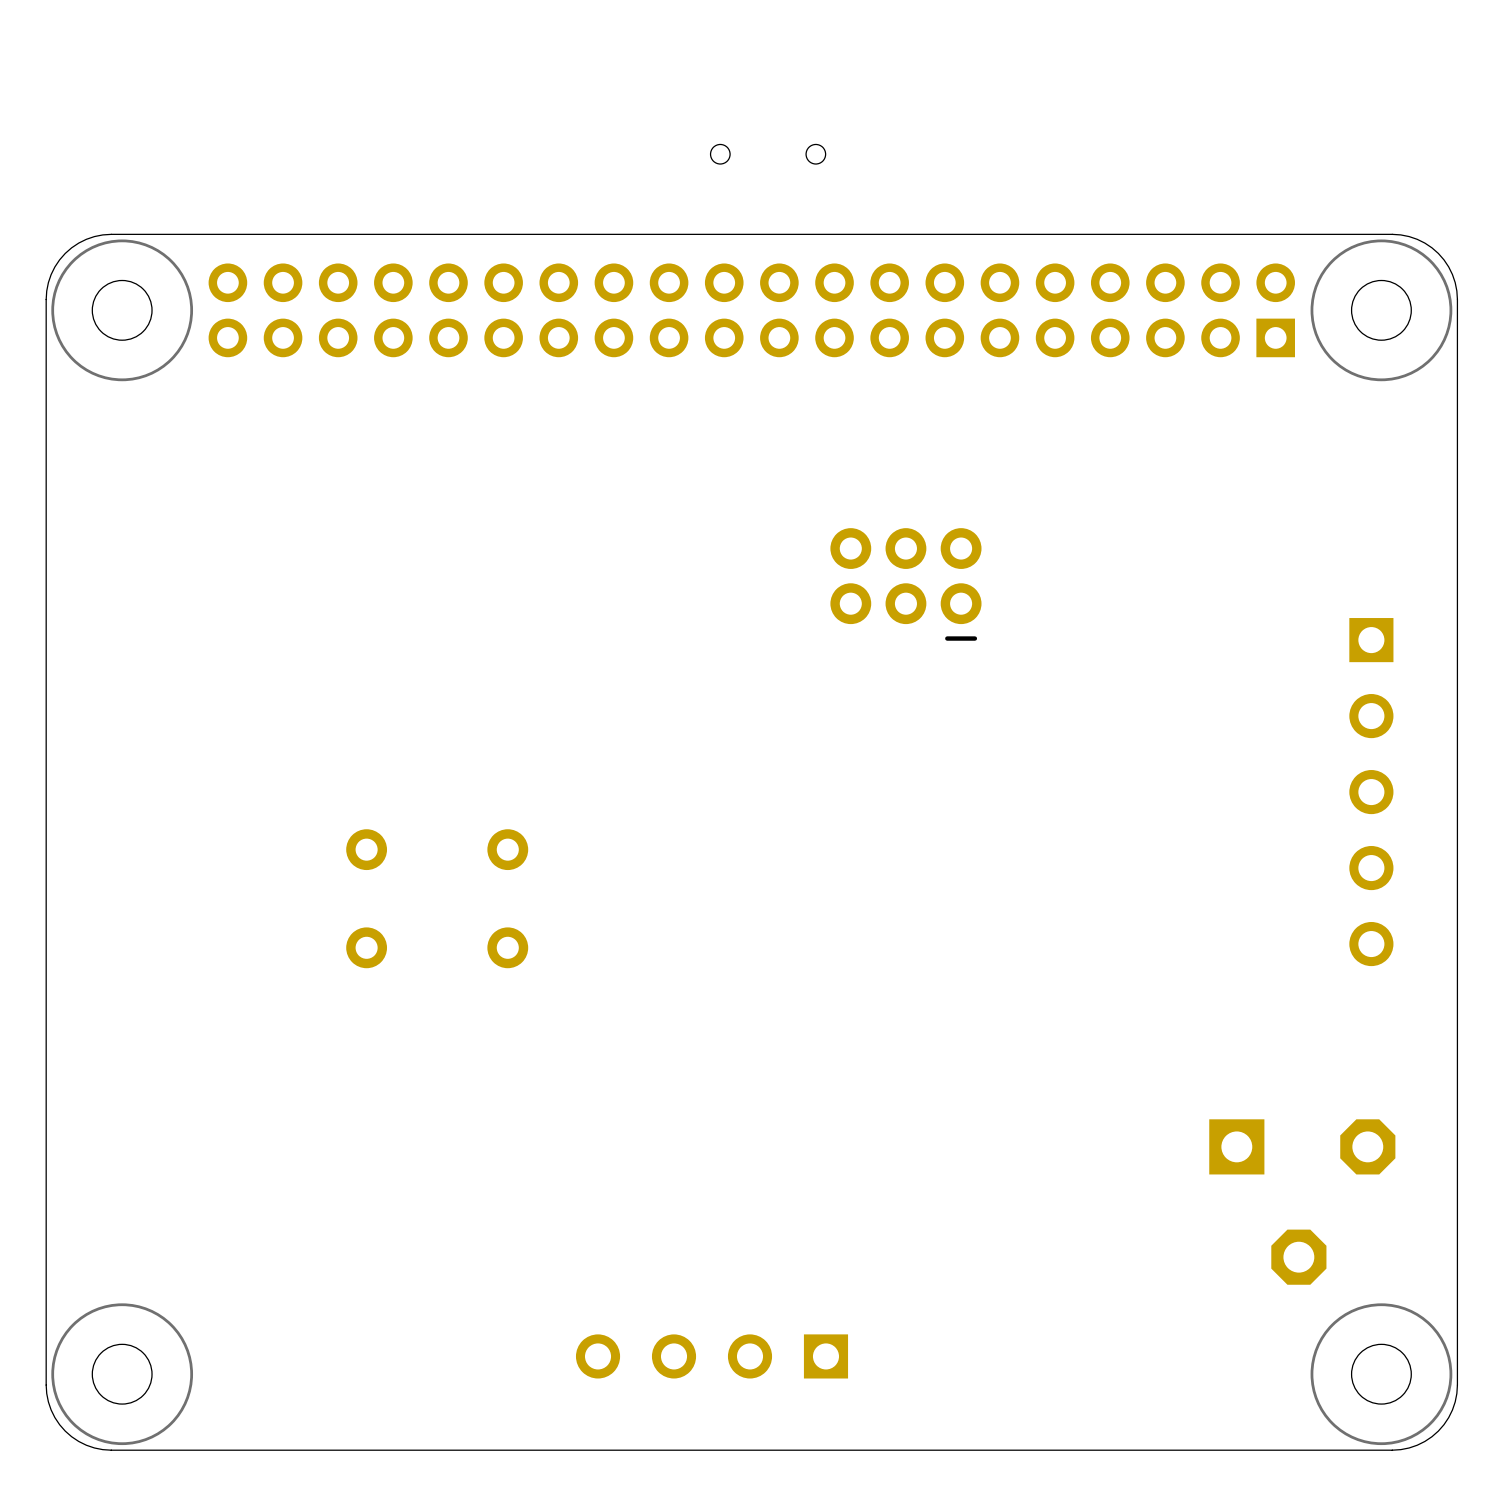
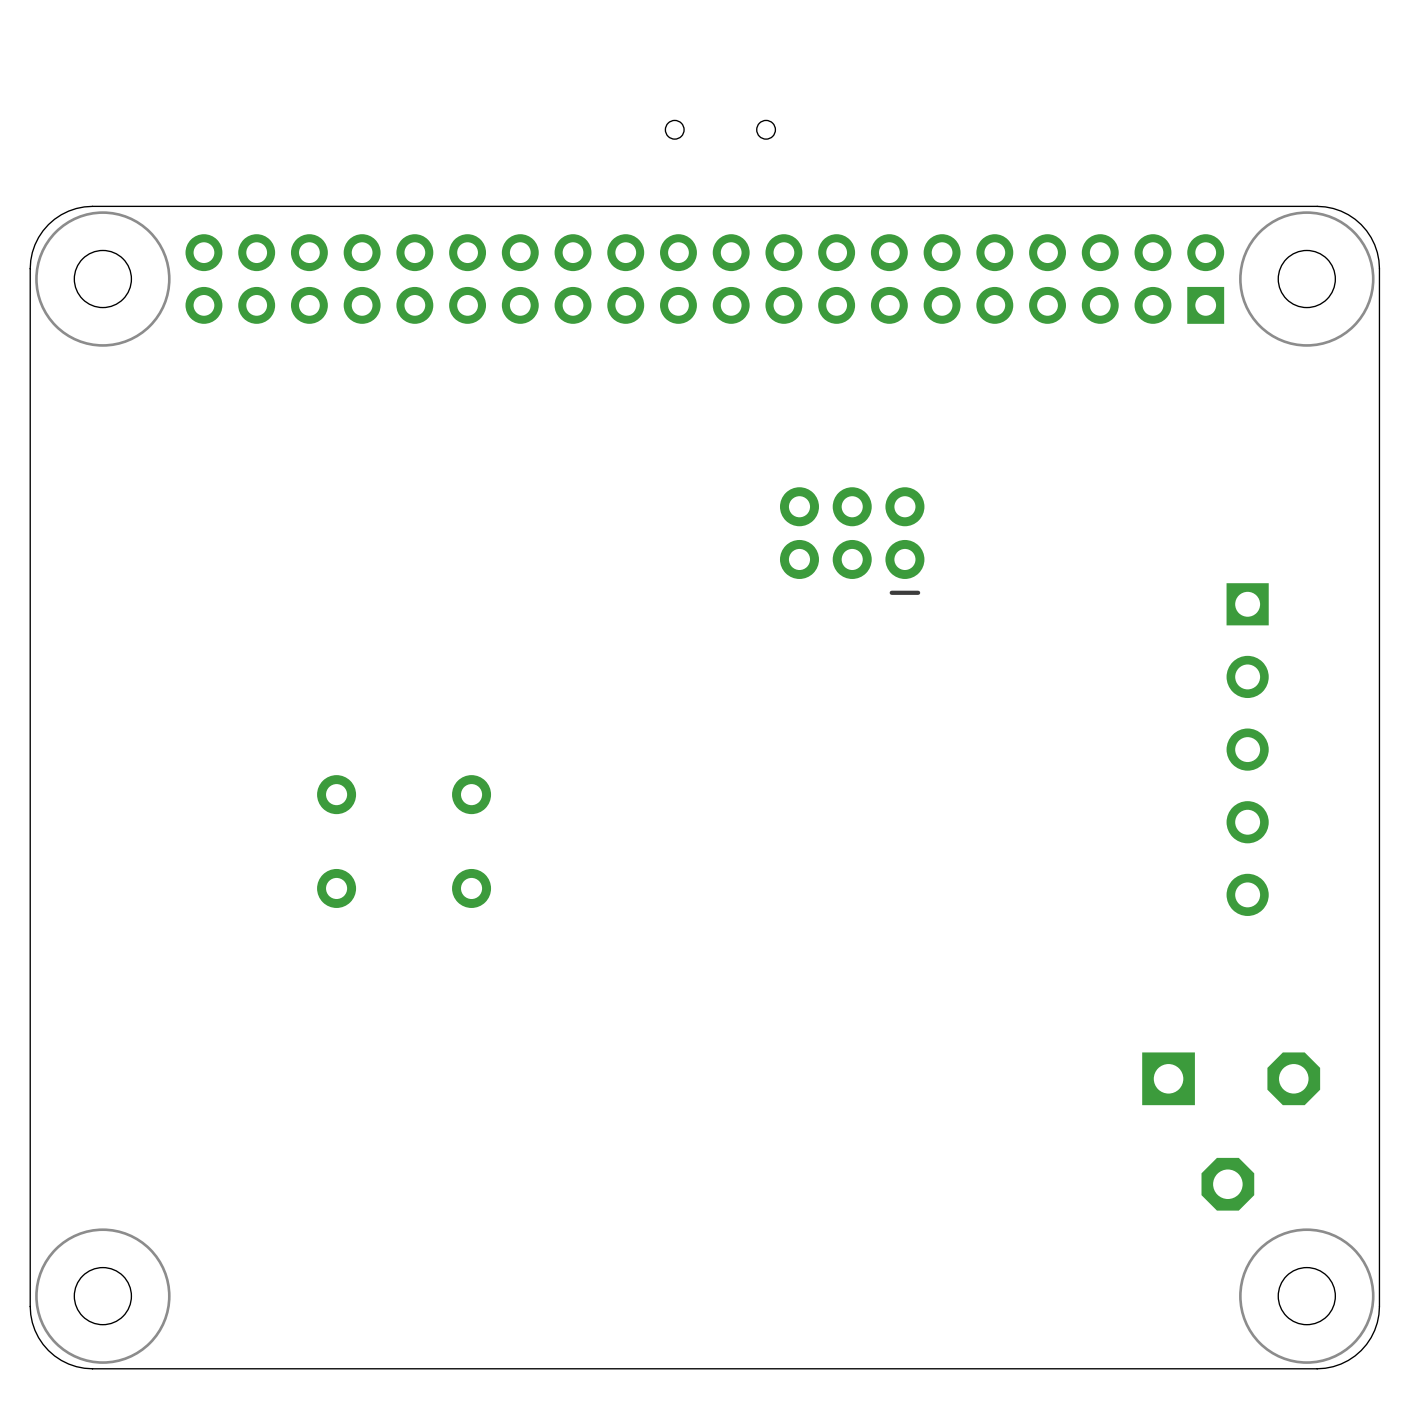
part position: (1371, 792) -> (1247, 749)
part: (712, 1356) -> none

